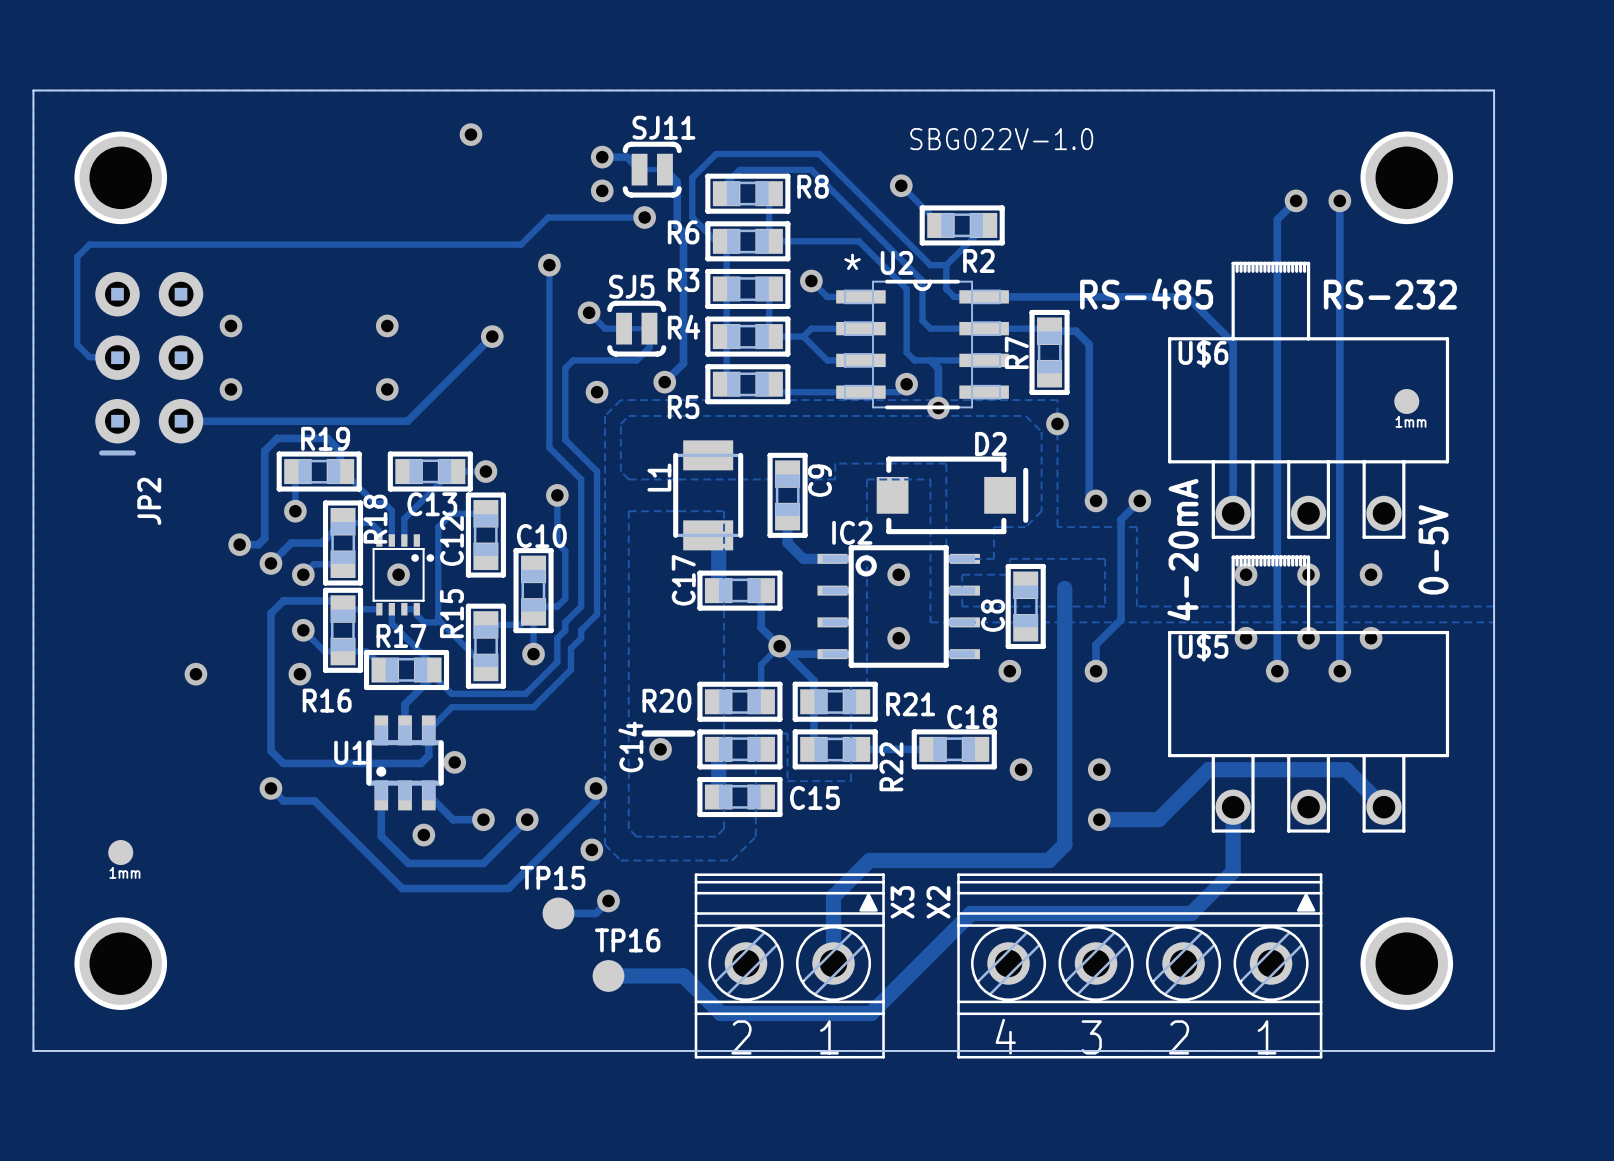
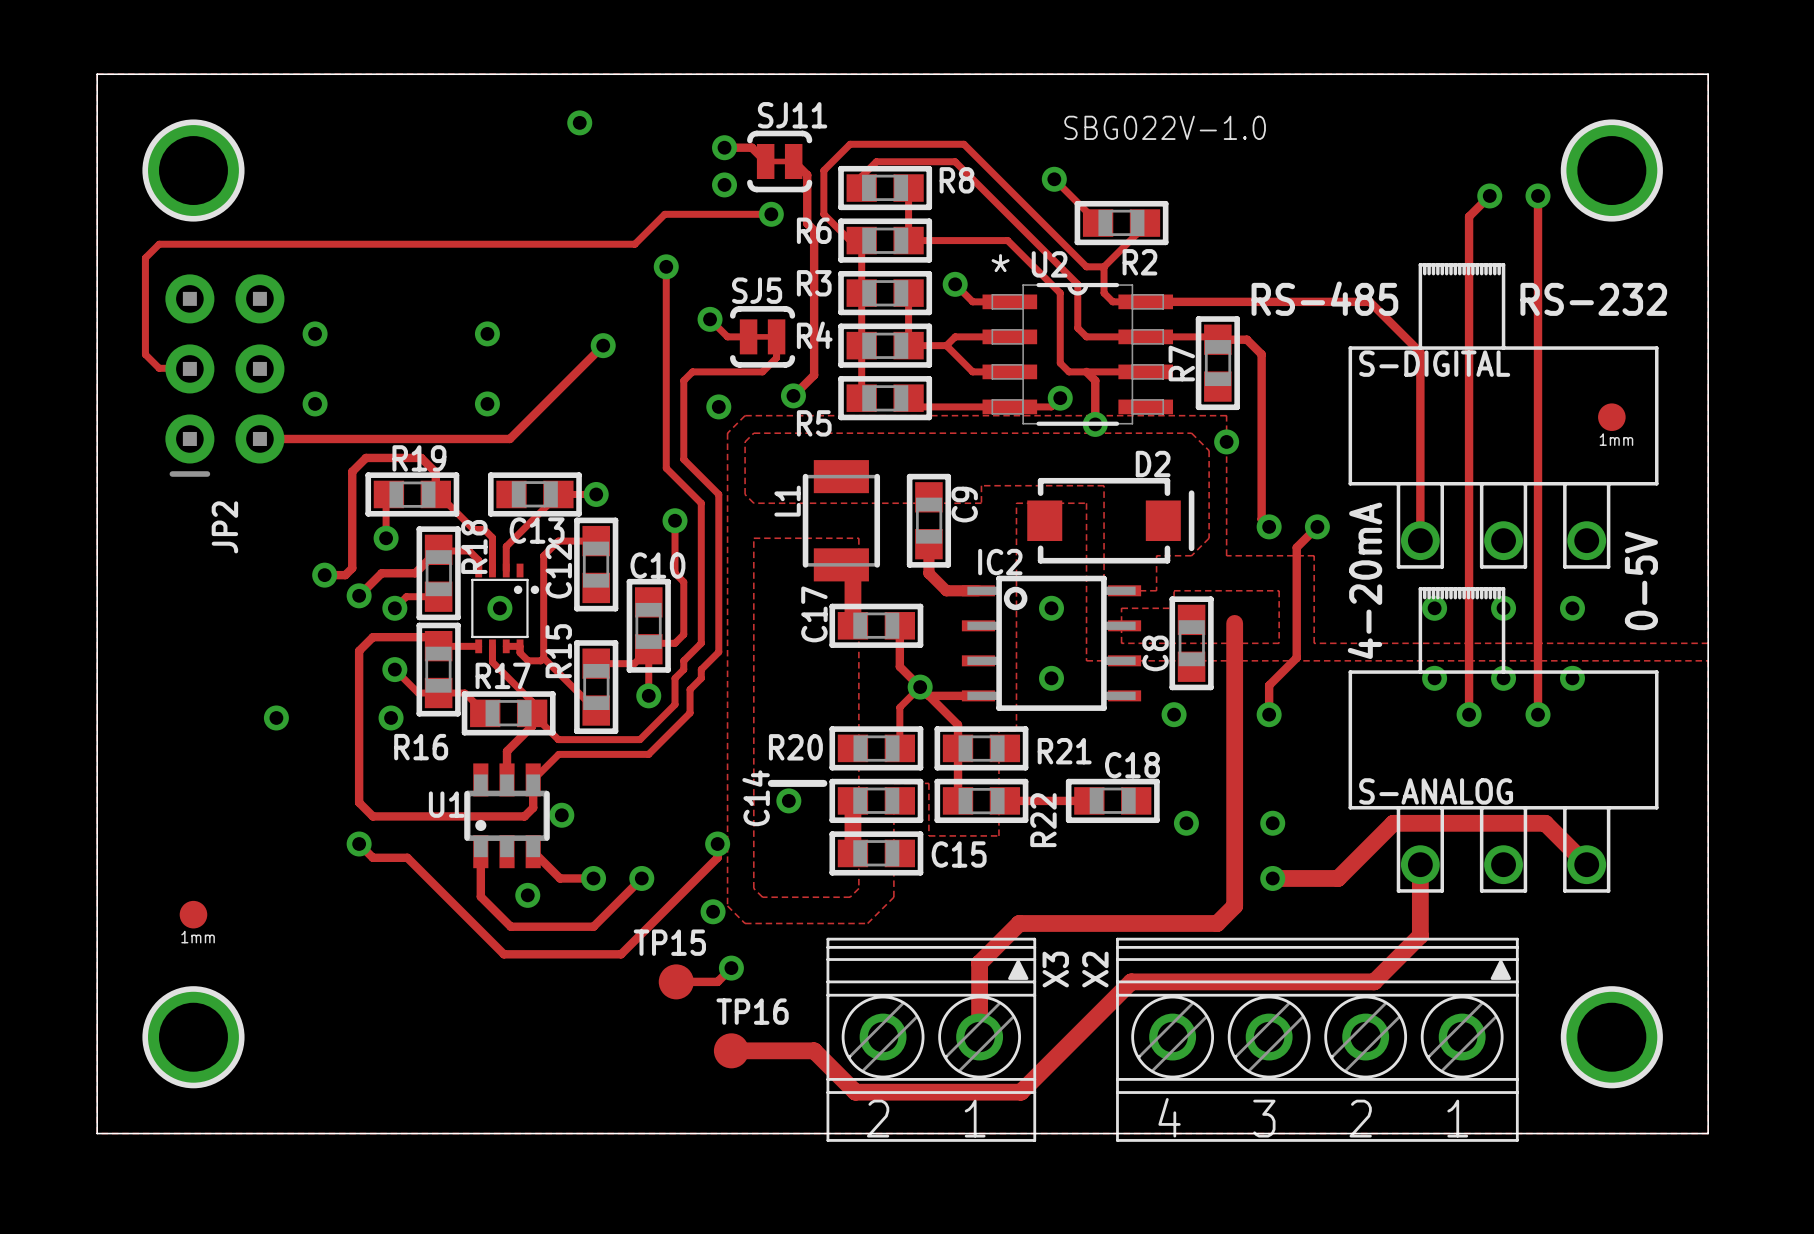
U$6 name: U$6 (1203, 352) -> S-DIGITAL (1434, 363)
U$5 name: U$5 (1203, 646) -> S-ANALOG (1436, 791)

